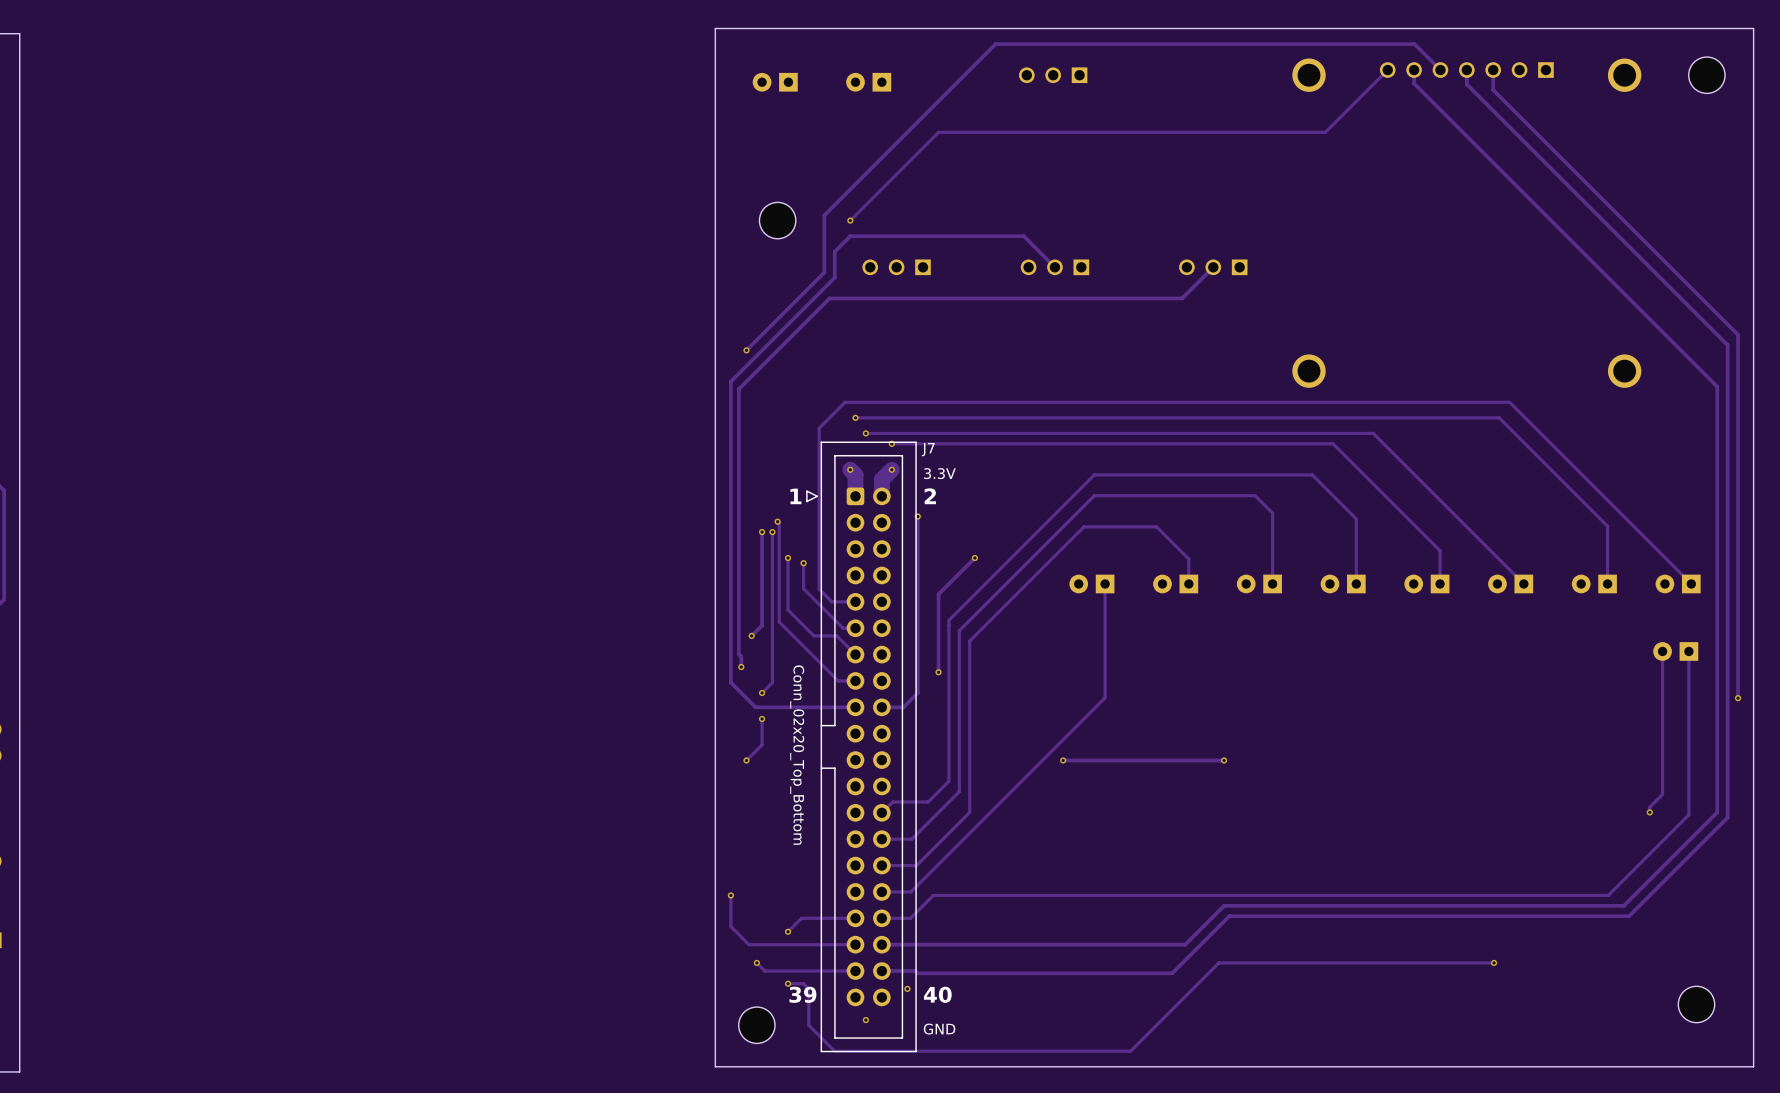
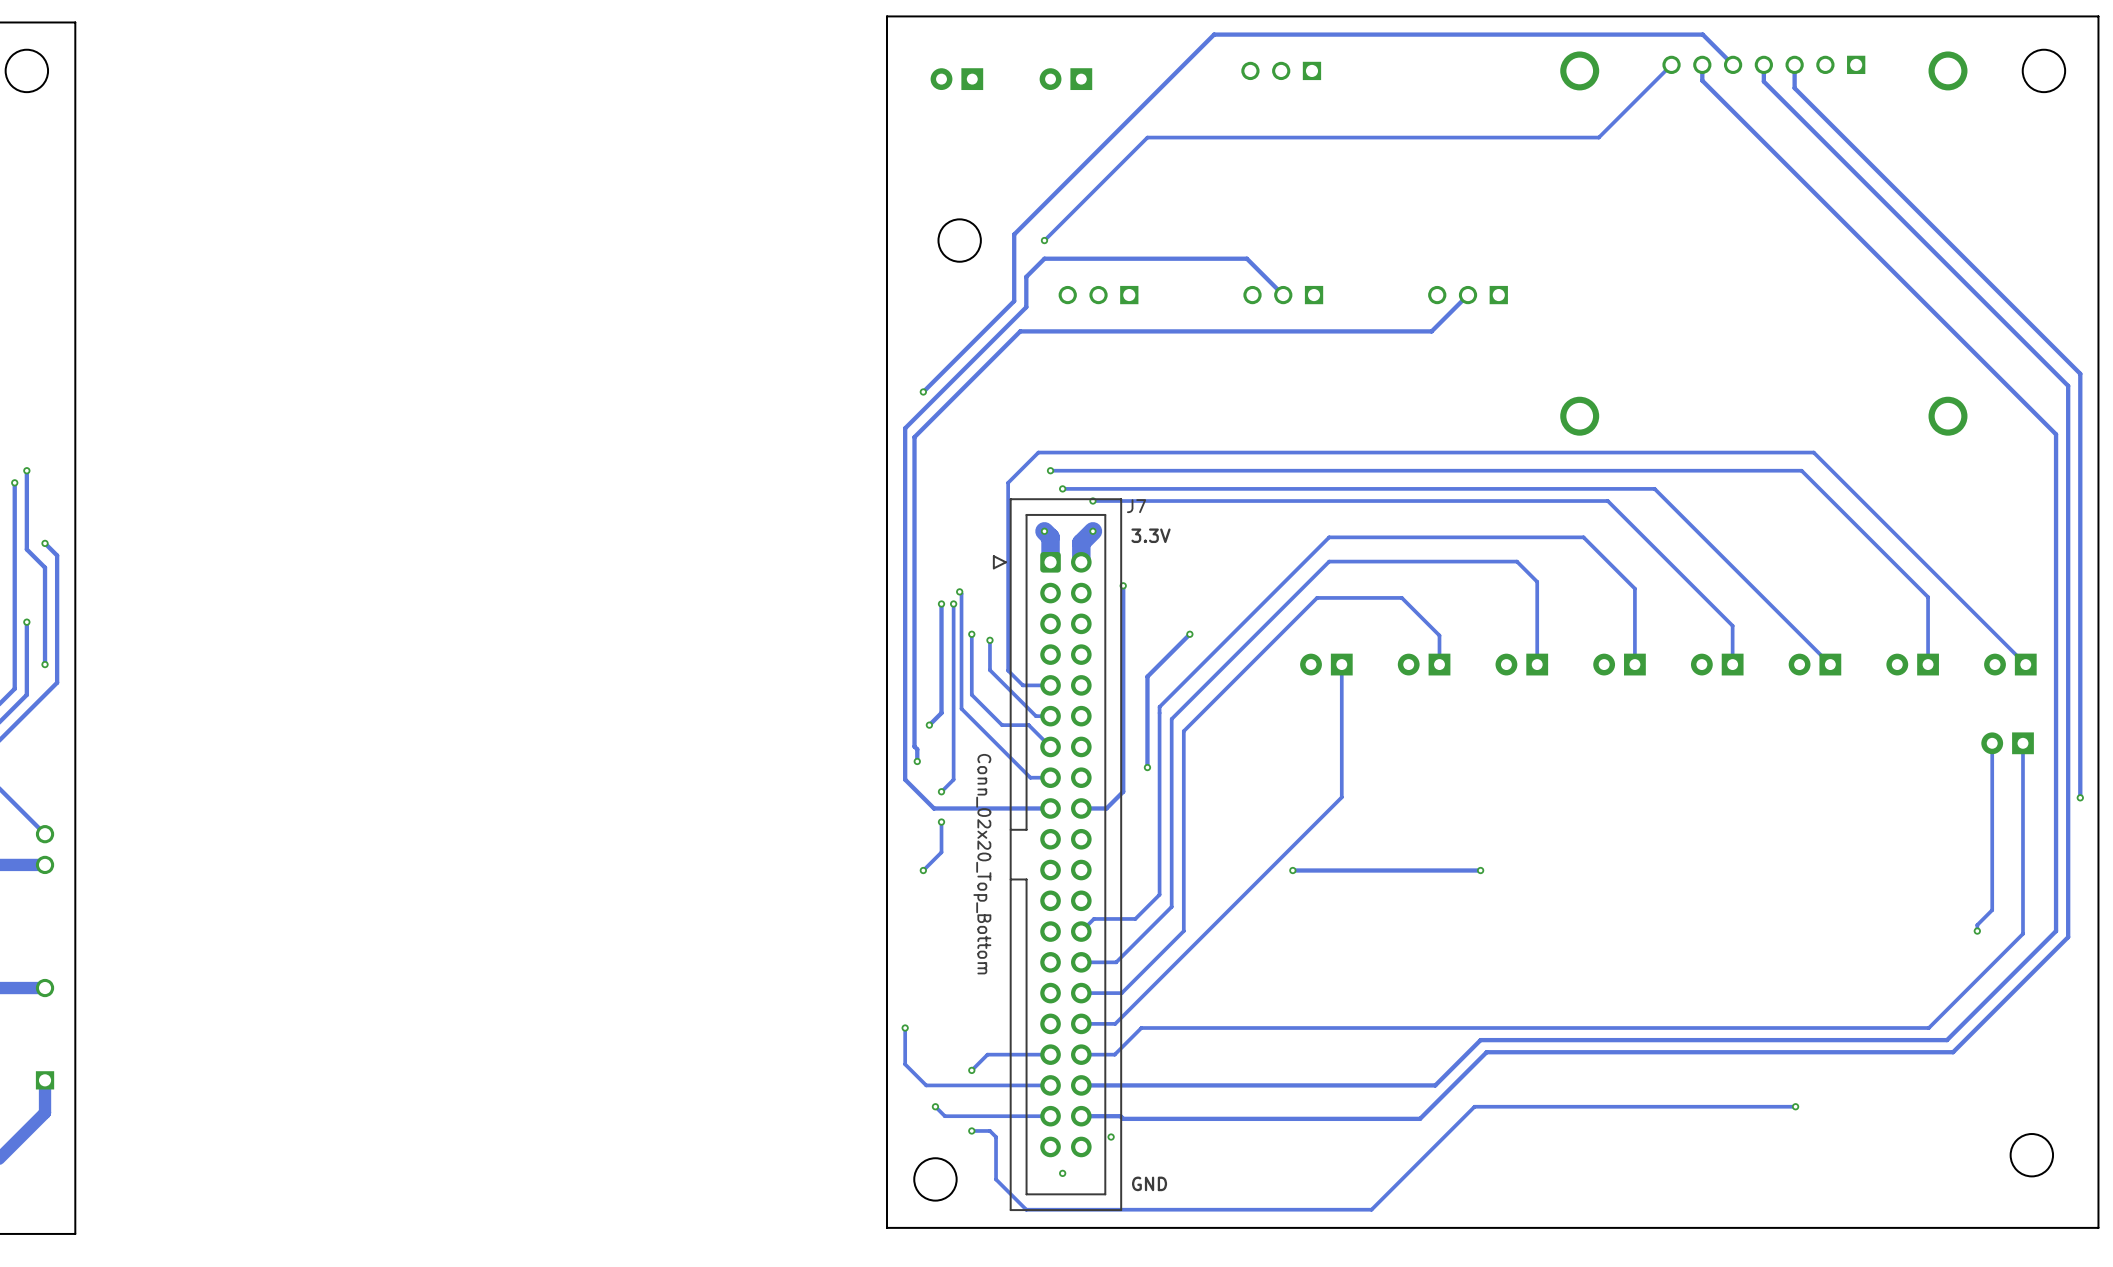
text: 1 (795, 496) -> none
text: 2 (930, 496) -> none
text: 39 (802, 994) -> none
text: 40 (937, 994) -> none

